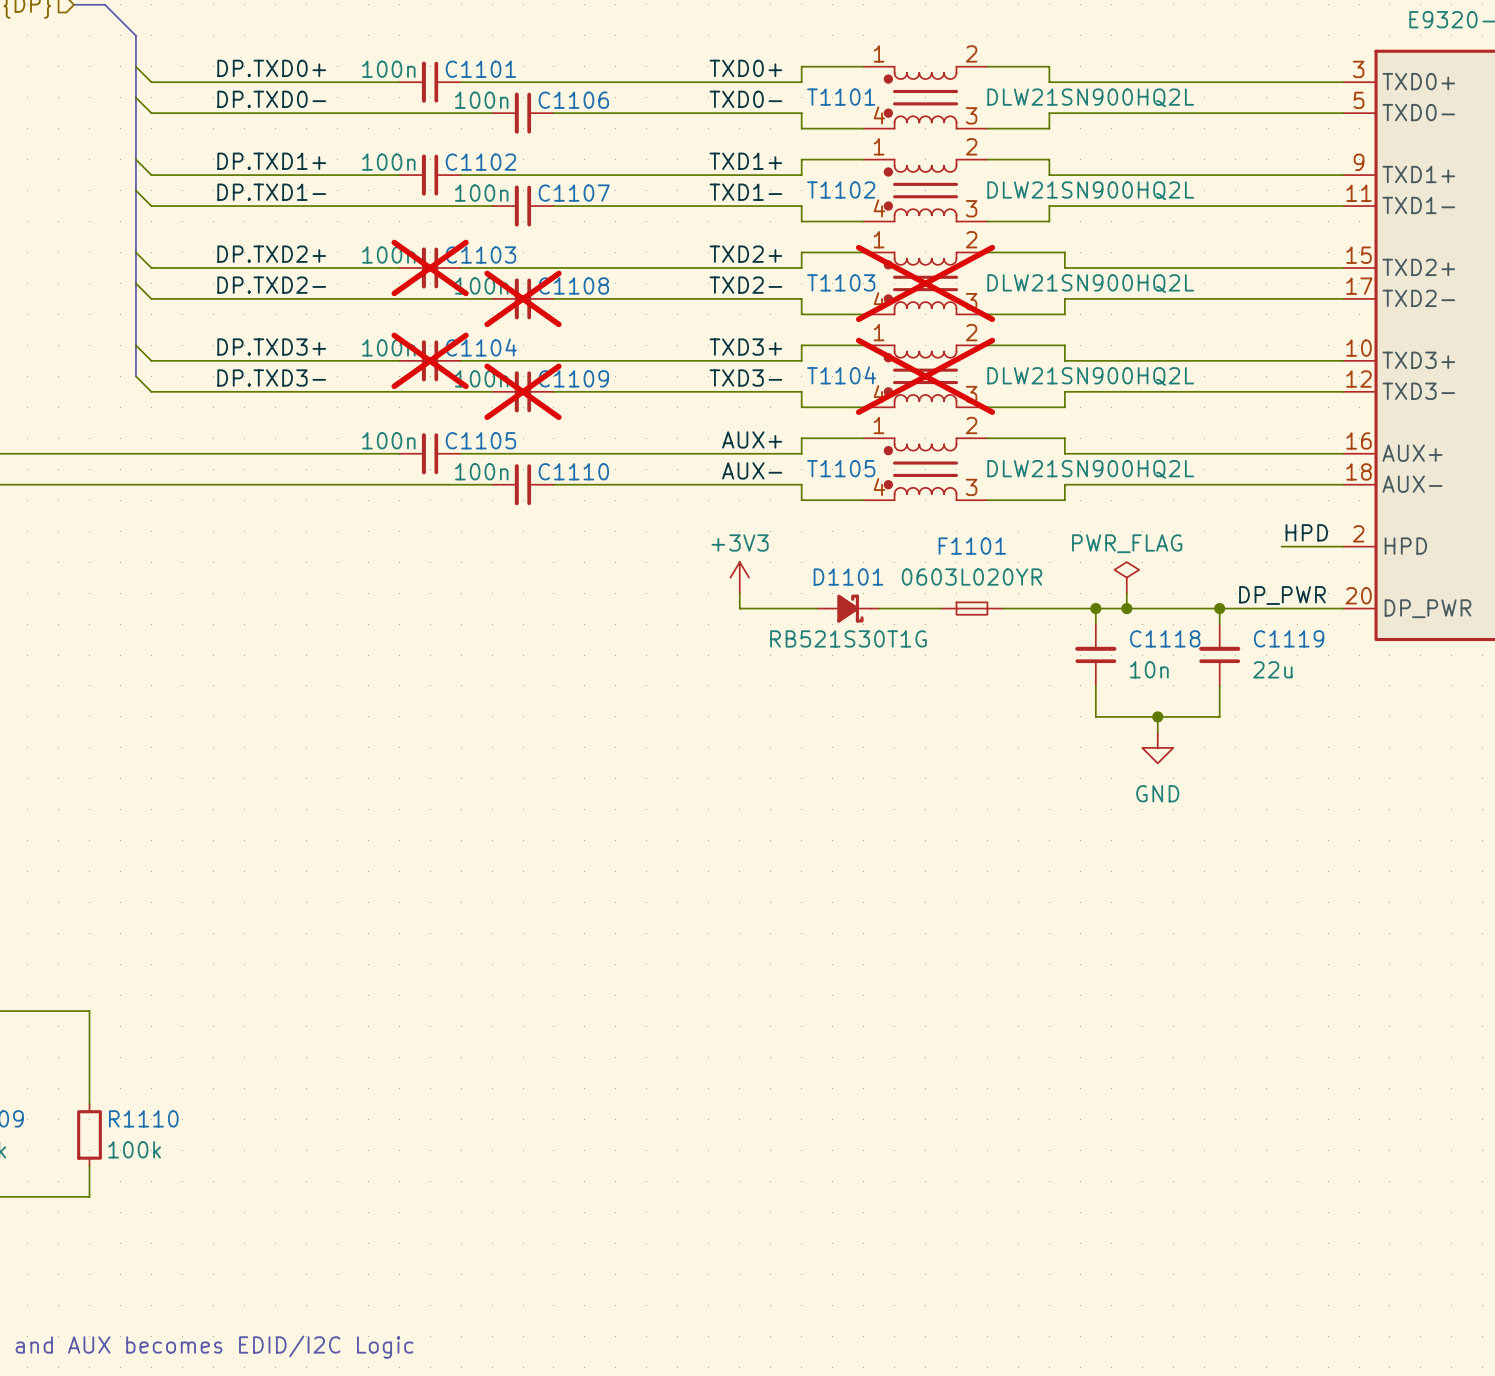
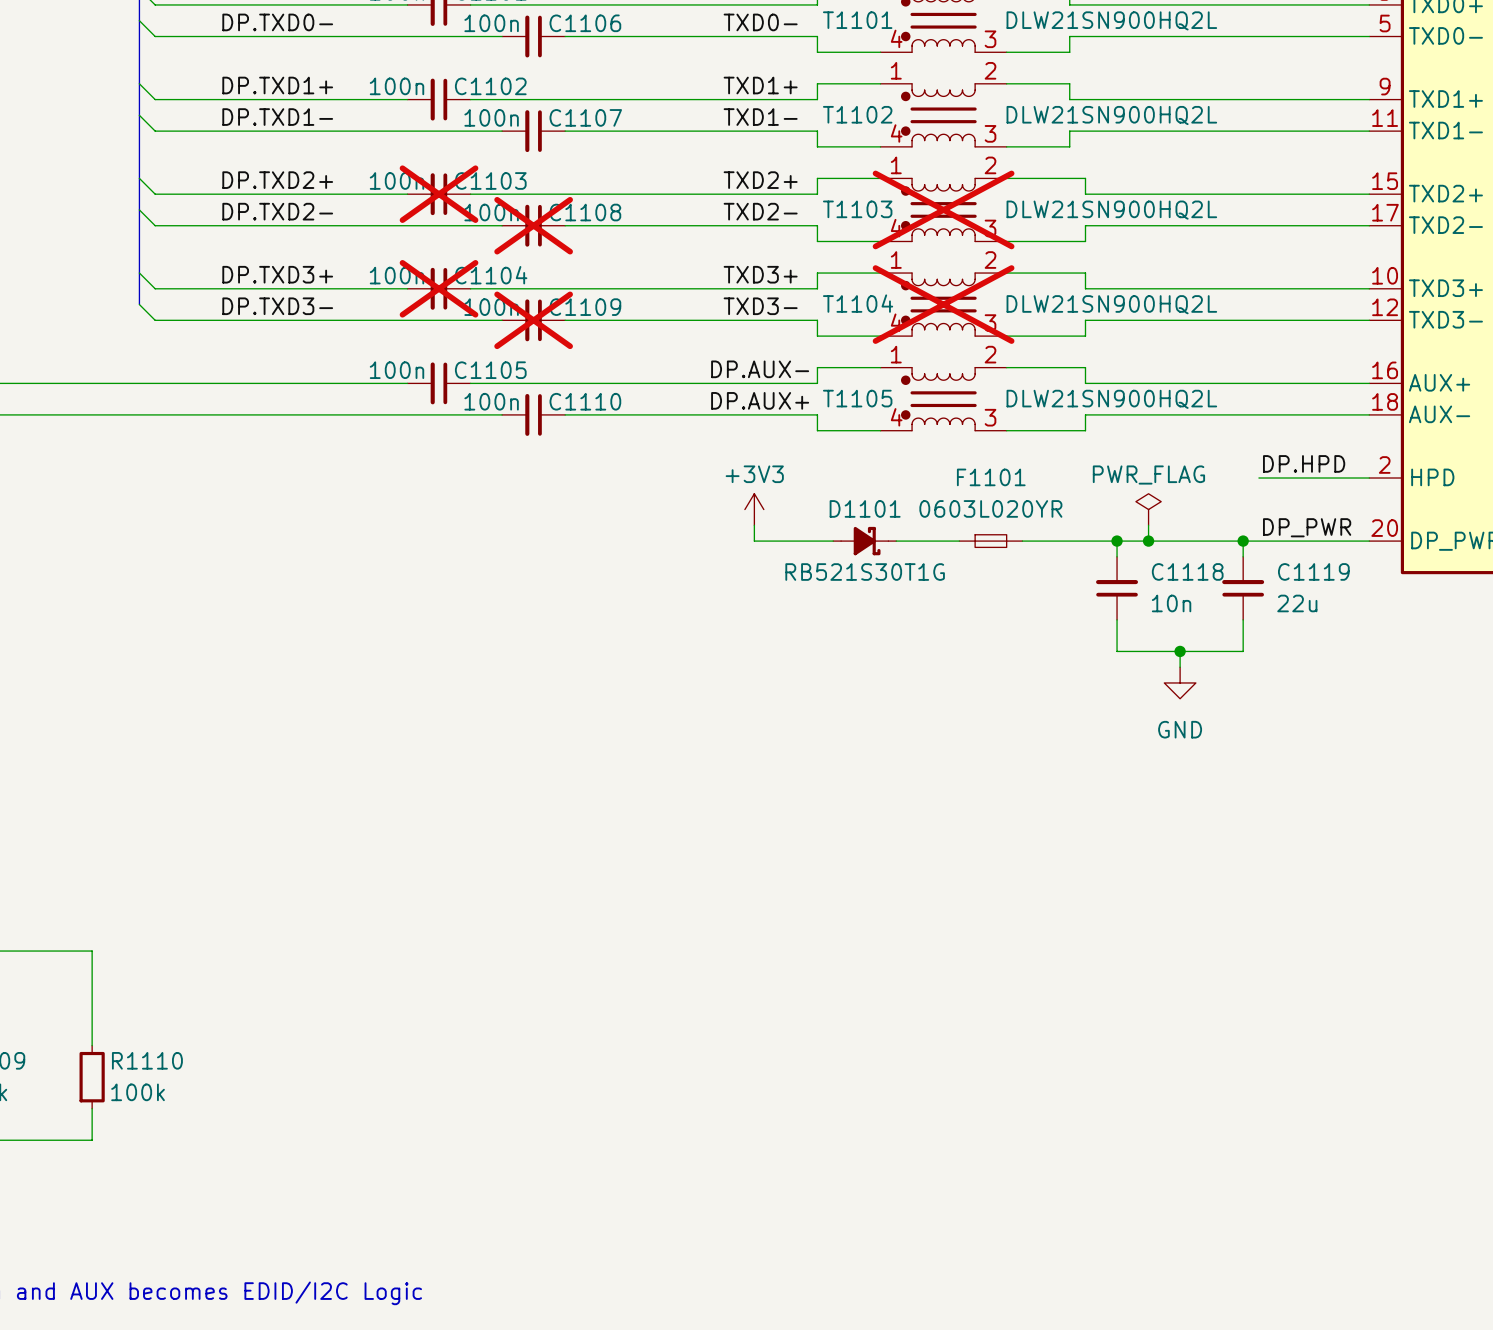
label: AUX+ (752, 439) -> DP.AUX+ (760, 400)
label: AUX- (752, 470) -> DP.AUX- (760, 369)
label: HPD (1306, 532) -> DP.HPD (1304, 463)
wire: none -> (1258, 478) (1306, 478)

